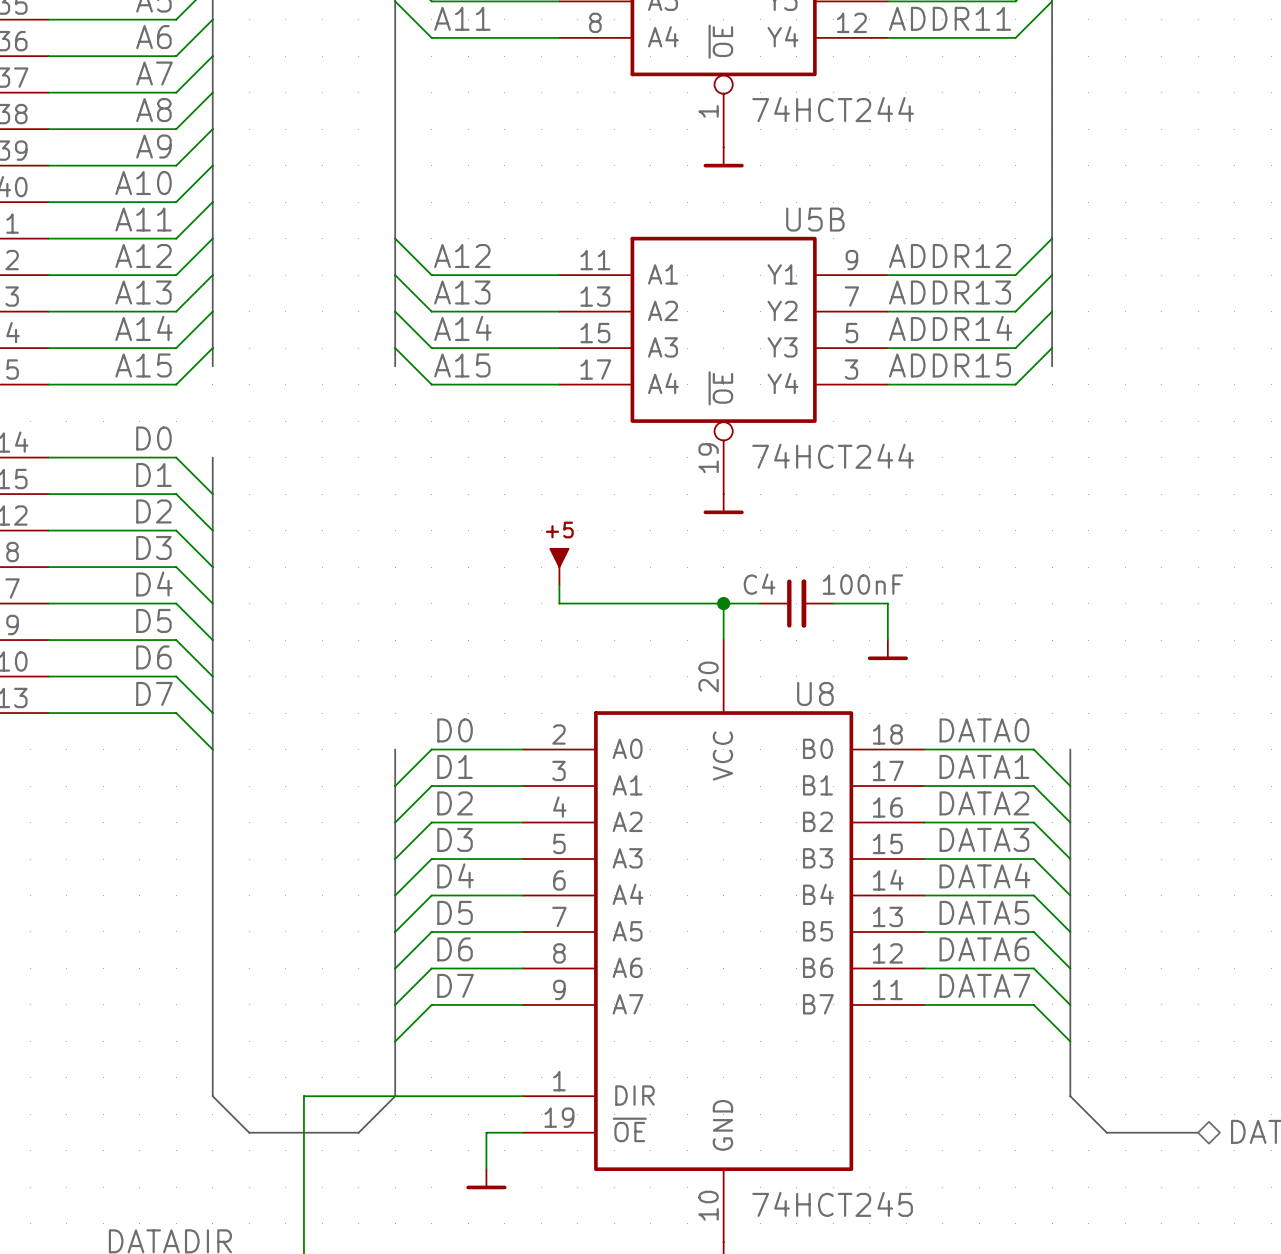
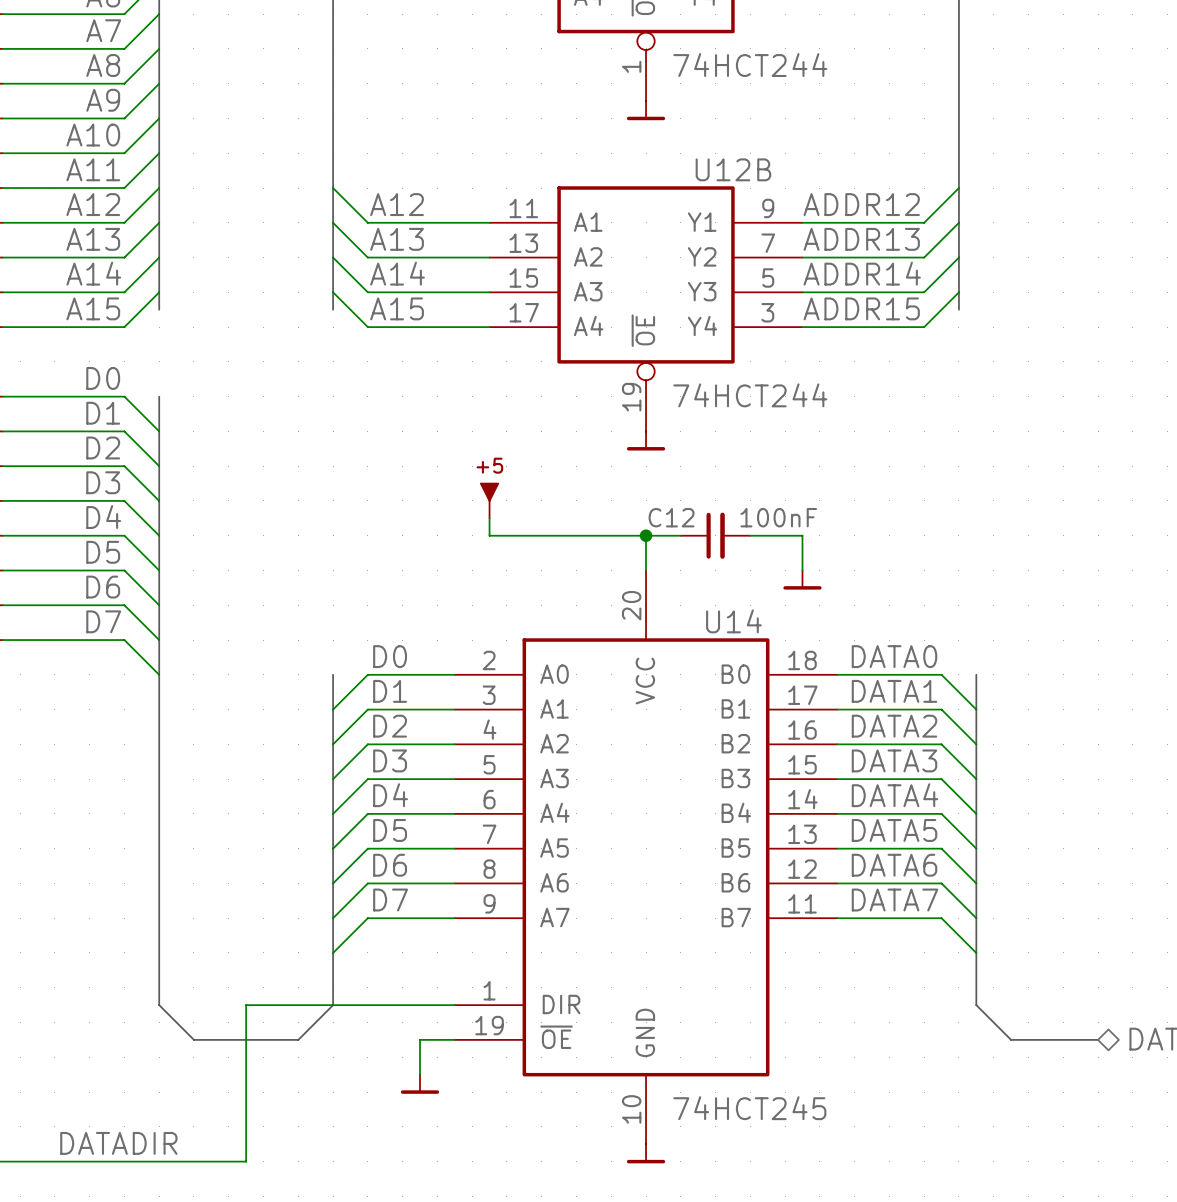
U5B name: U5B (815, 219) -> U12B (733, 169)
C4 name: C4 (759, 584) -> C12 (671, 517)
U8 name: U8 (815, 693) -> U14 (733, 621)

